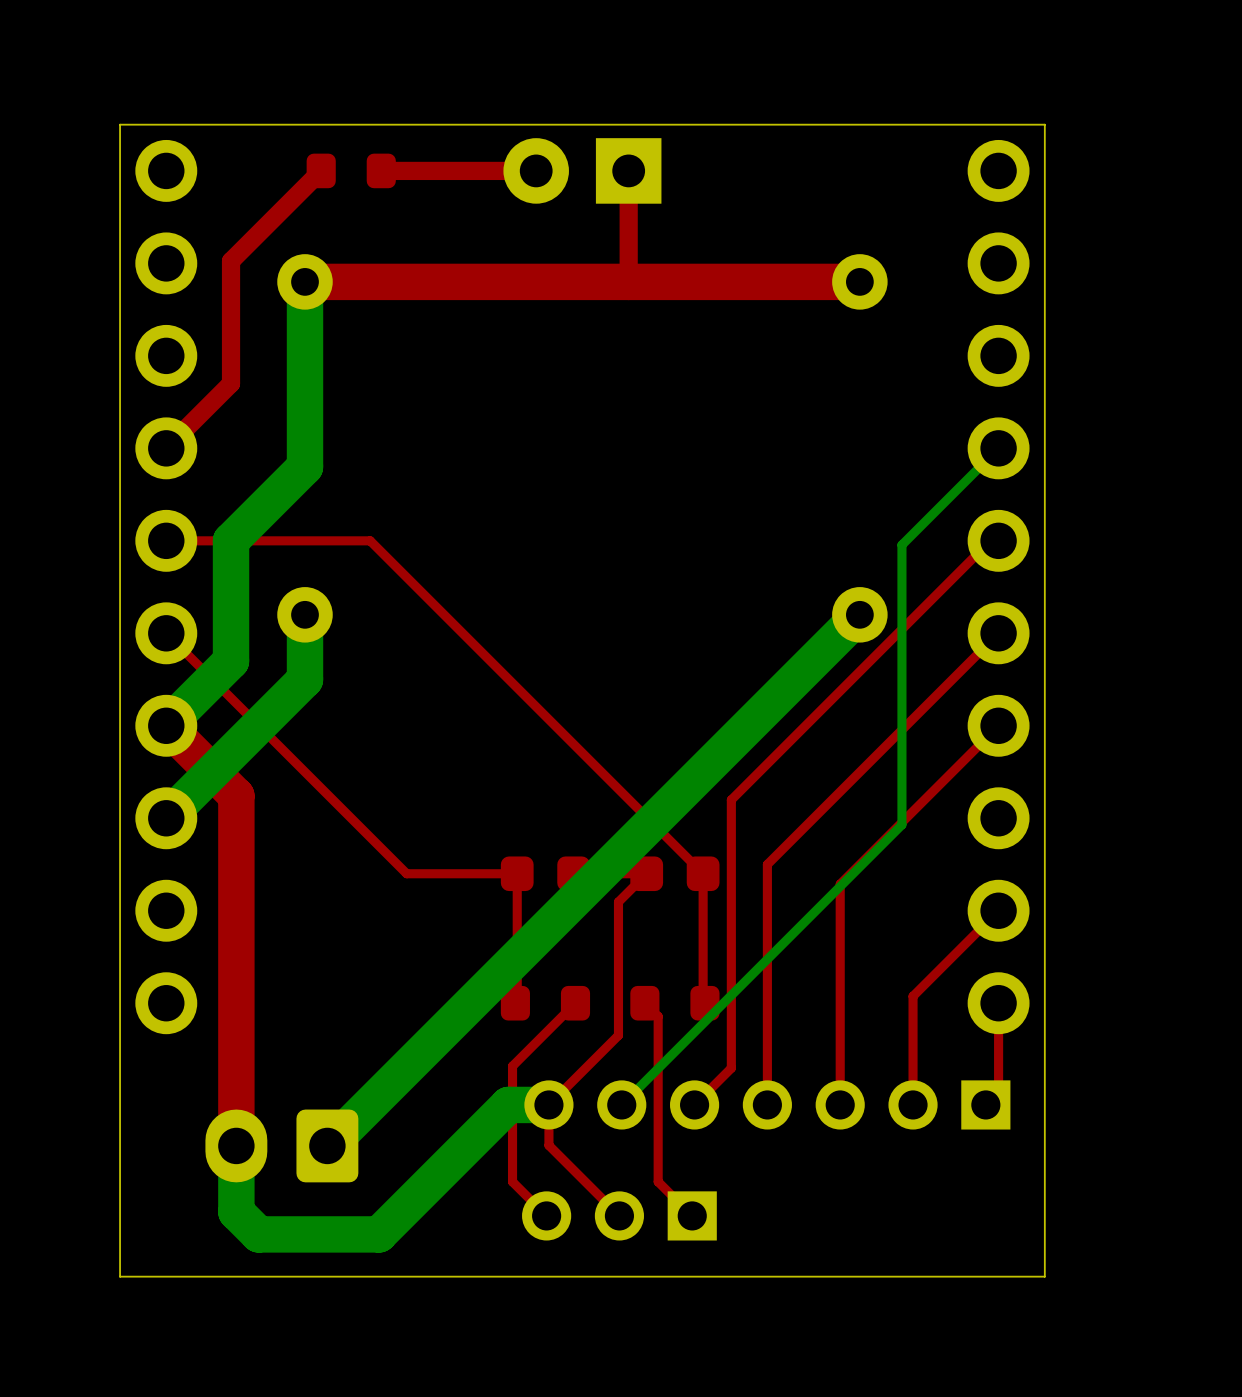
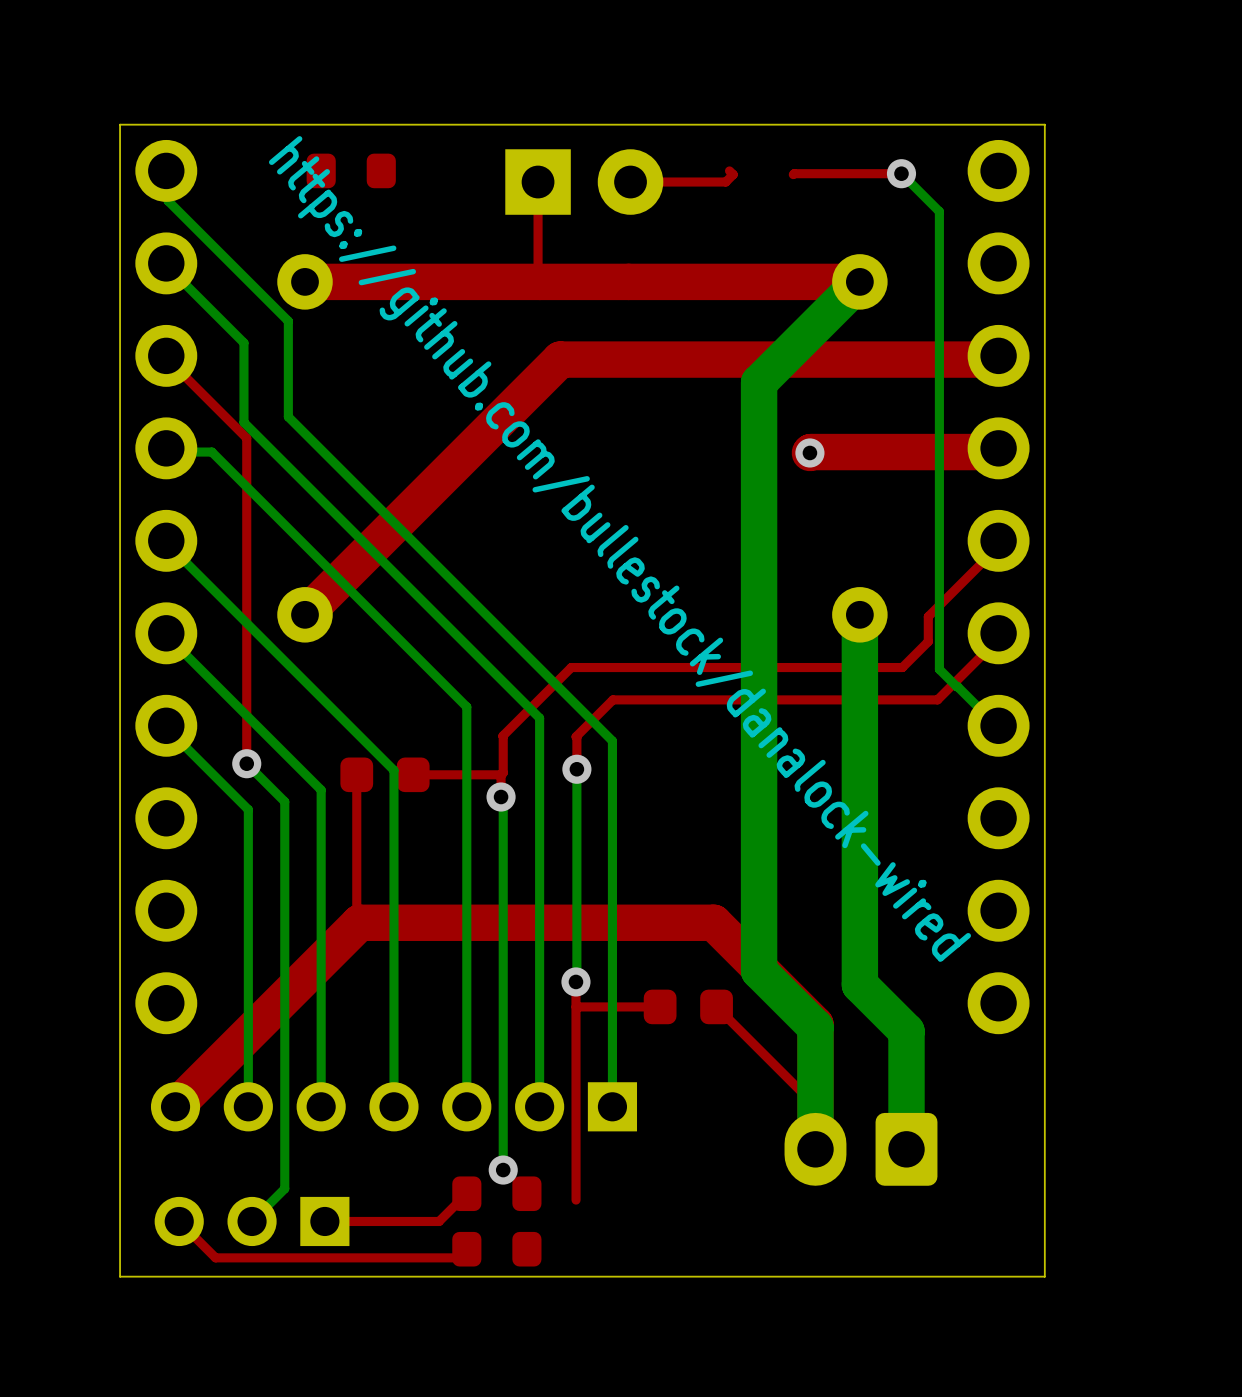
top track: (321, 170) (231, 261) (231, 383) (166, 448) -> none
top track: (536, 170) (381, 170) -> none
part rotation: 0° (582, 170) -> 180° (584, 182)
top track: (628, 170) (628, 281) -> none
top track: none -> (729, 170) (733, 174) (725, 182) (630, 182)
bottom track: none -> (901, 173) (939, 211) (939, 669) (1000, 729)
top track: none -> (901, 173) (793, 174)
via: none -> (901, 173)
bottom track: none -> (168, 174) (168, 200) (288, 321) (288, 416) (612, 741) (612, 1106)
top track: none -> (538, 182) (538, 280)
bottom track: none -> (168, 267) (243, 342) (243, 422) (539, 718) (539, 1106)
bottom track: (305, 281) (305, 466) (231, 540) (231, 661) (166, 725) -> none
bottom track: none -> (859, 281) (759, 382) (759, 970) (815, 1027) (815, 1149)
top track: none -> (168, 359) (246, 438) (246, 763)
top track: none -> (1000, 359) (560, 359) (305, 614)
bottom track: (998, 448) (901, 545) (901, 824) (621, 1104) -> none
bottom track: none -> (168, 452) (211, 452) (466, 706) (466, 1106)
via: none -> (809, 452)
top track: none -> (1000, 452) (809, 452)
top track: (166, 540) (370, 540) (703, 873) (703, 1001) (704, 1003) -> none
top track: (990, 540) (731, 799) (731, 1068) (694, 1104) -> none
bottom track: none -> (168, 544) (393, 770) (393, 1106)
top track: none -> (1000, 544) (928, 616) (928, 641) (902, 667) (571, 667) (502, 735)
text: none -> https://github.com/bullestock/danalock-wired (619, 548)
bottom track: (305, 614) (305, 679) (166, 818) -> none
bottom track: (859, 614) (327, 1145) -> (859, 614) (859, 984) (906, 1031) (906, 1149)
top track: (166, 633) (406, 873) (517, 873) (517, 1001) (515, 1003) -> none
top track: (998, 633) (767, 864) (767, 1104) -> none
bottom track: none -> (168, 637) (321, 790) (321, 1106)
top track: none -> (1000, 637) (937, 699) (612, 699) (576, 736) (576, 769)
top track: (166, 725) (236, 795) (236, 1145) -> none
top track: (998, 725) (840, 884) (840, 1104) -> none
bottom track: none -> (168, 729) (248, 809) (248, 1106)
top track: none -> (503, 736) (501, 797)
bottom track: none -> (246, 763) (284, 801) (284, 1188) (252, 1221)
via: none -> (246, 763)
bottom track: none -> (576, 769) (575, 981)
via: none -> (576, 769)
top track: none -> (356, 774) (356, 919) (359, 922)
part: none -> (384, 774)
top track: none -> (501, 774) (413, 774)
bottom track: none -> (501, 797) (503, 799) (503, 1170)
via: none -> (501, 797)
part: (545, 873) -> none
top track: (573, 873) (646, 873) (618, 901) (618, 1035) (548, 1104) (548, 1145) (619, 1215) -> none
part: (674, 873) -> none
top track: (998, 910) (913, 996) (913, 1104) -> none
top track: none -> (359, 922) (713, 922) (815, 1024) (815, 1149) (815, 1105) (716, 1006)
top track: none -> (359, 922) (175, 1106)
top track: none -> (575, 981) (576, 1200)
via: none -> (575, 981)
part footprint: [630, 985, 720, 1021] -> [643, 989, 733, 1025]
part: (545, 1003) -> none
top track: (575, 1003) (512, 1066) (512, 1181) (546, 1215) -> none
top track: (644, 1003) (658, 1016) (658, 1181) (692, 1215) -> none
top track: (998, 1003) (998, 1092) (985, 1104) -> none
top track: none -> (660, 1006) (576, 1006)
bottom track: (548, 1104) (508, 1104) (378, 1234) (258, 1234) (236, 1212) (236, 1145) -> none
part position: (767, 1104) -> (393, 1106)
part position: (281, 1145) -> (860, 1149)
via: none -> (503, 1170)
top track: none -> (466, 1193) (439, 1221) (324, 1221)
part: none -> (496, 1193)
part position: (619, 1215) -> (252, 1221)
top track: none -> (179, 1221) (215, 1257) (458, 1257) (466, 1249)
part: none -> (496, 1249)

